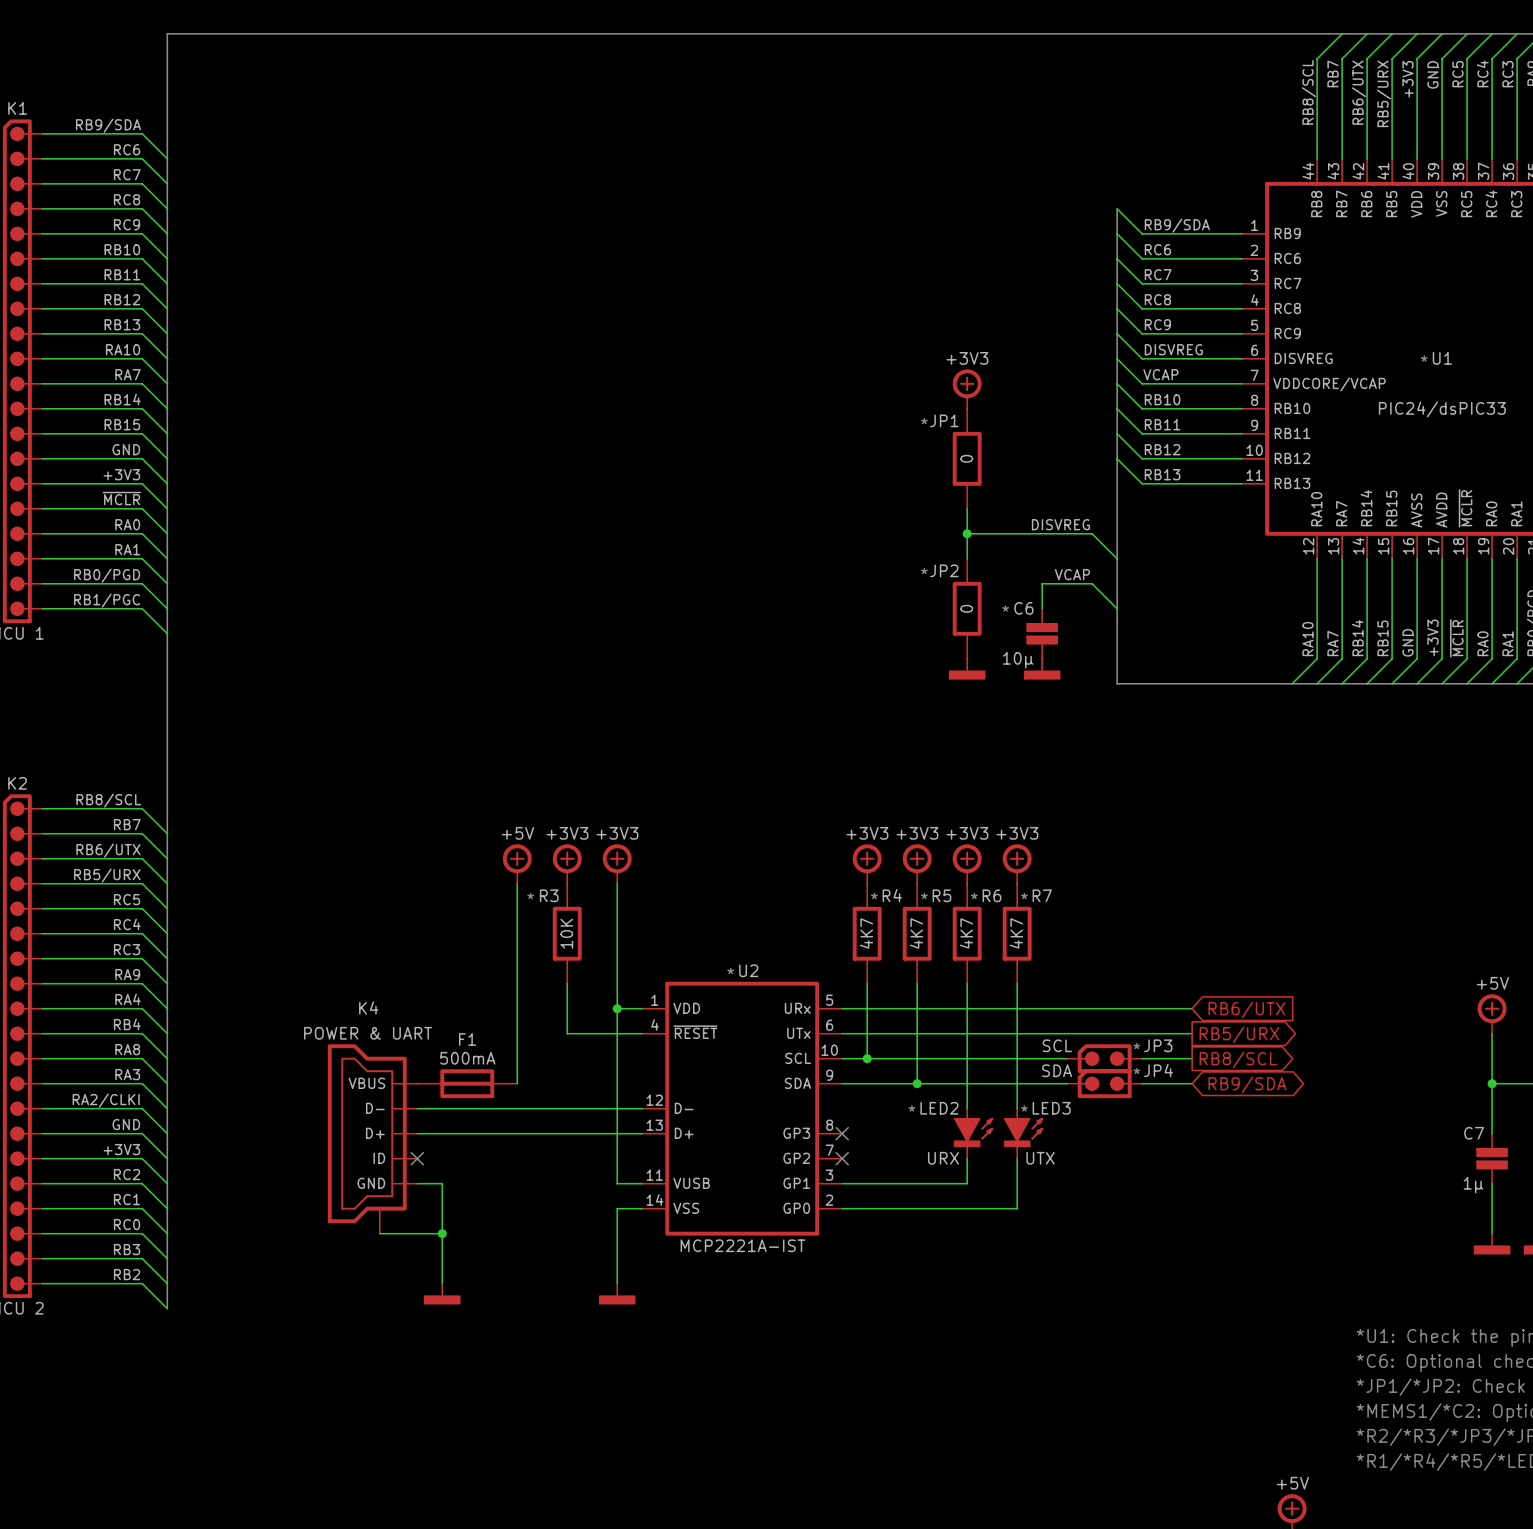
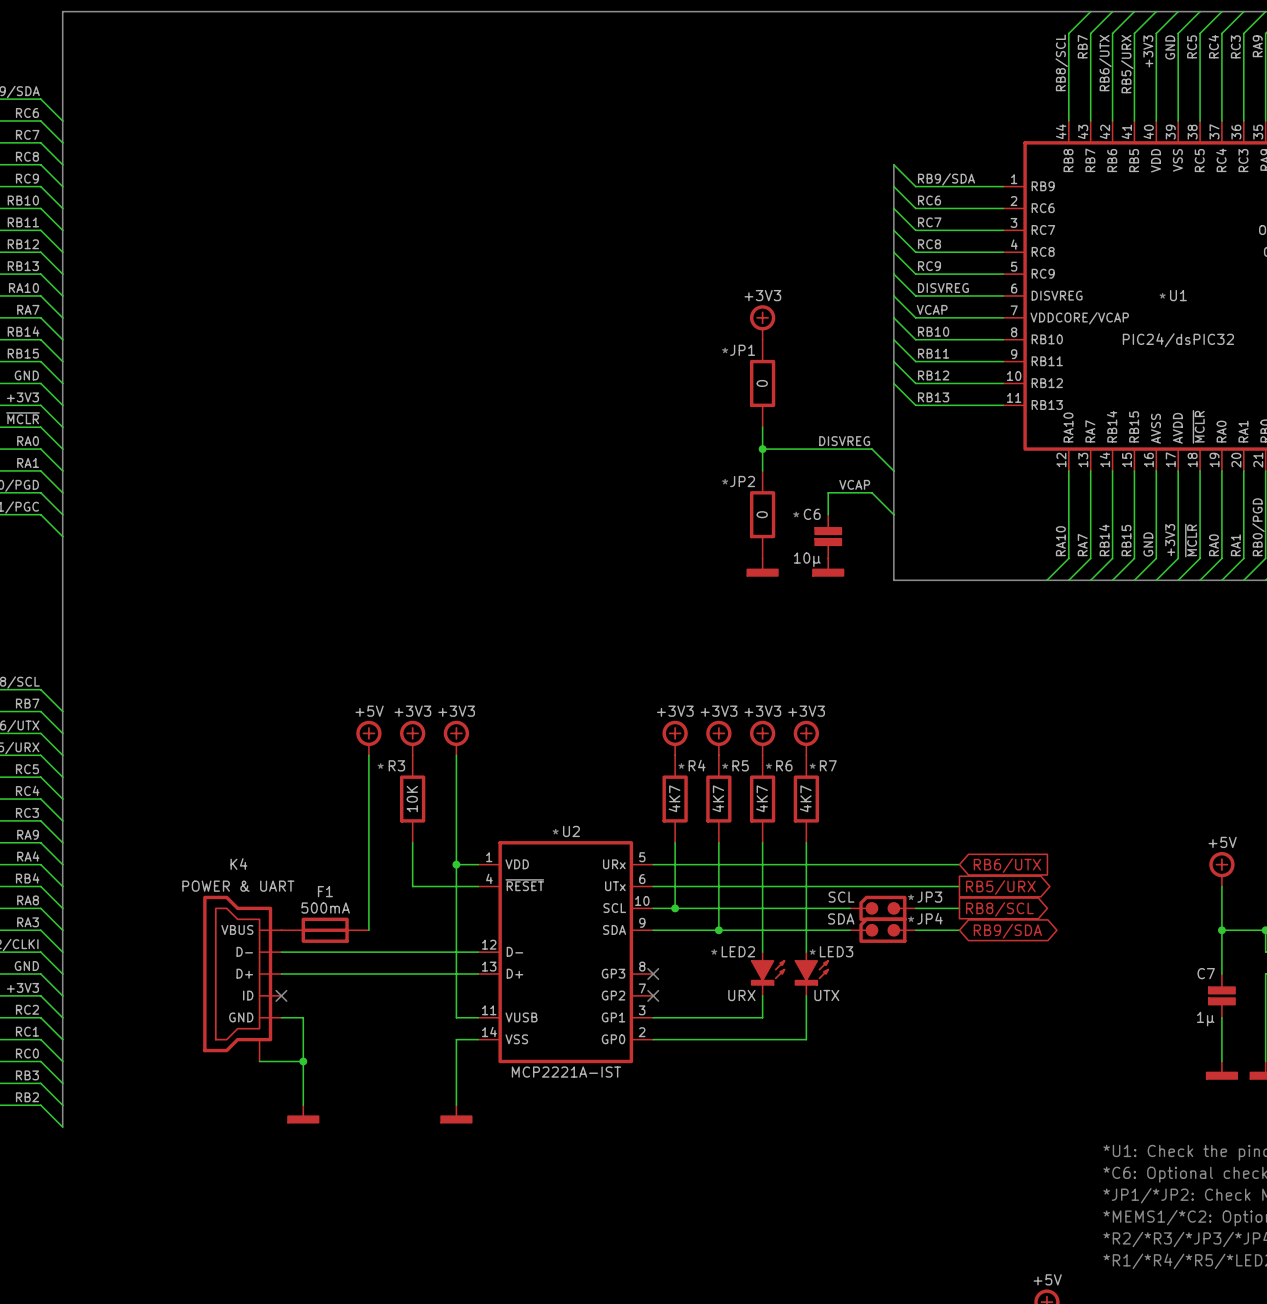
U1 value: PIC24/dsPIC33 (1442, 409) -> PIC24/dsPIC32 (1178, 340)
K4 symbol: [327, 1044, 418, 1234] -> [203, 895, 282, 1062]
wire: (379, 1233) (392, 1233) -> none

